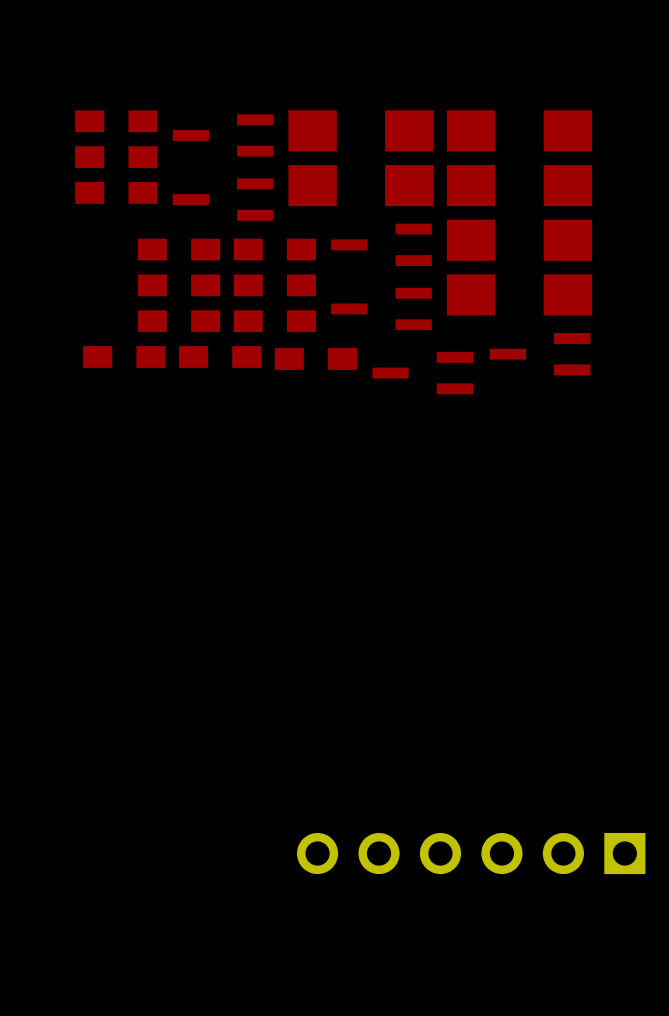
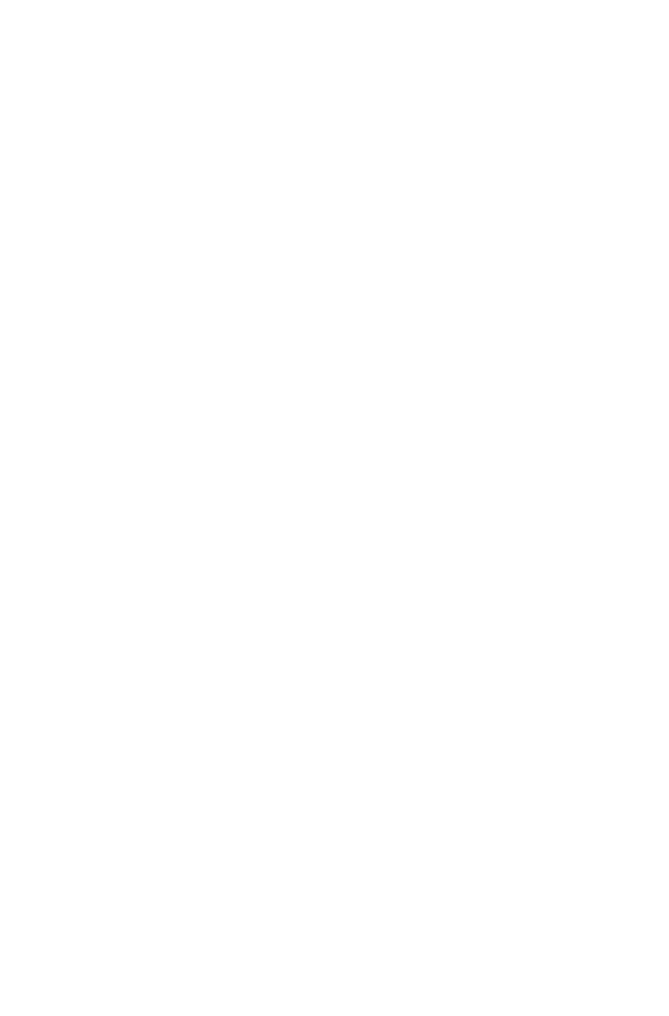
part: (116, 121) -> none
part: (360, 130) -> none
part: (519, 130) -> none
part: (223, 135) -> none
part: (116, 157) -> none
part: (360, 185) -> none
part: (519, 185) -> none
part: (116, 192) -> none
part: (223, 199) -> none
part: (519, 240) -> none
part: (381, 244) -> none
part: (179, 249) -> none
part: (274, 249) -> none
part: (179, 285) -> none
part: (274, 285) -> none
part: (519, 294) -> none
part: (381, 308) -> none
part: (179, 321) -> none
part: (274, 321) -> none
part: (540, 354) -> none
part: (124, 356) -> none
part: (220, 356) -> none
part: (315, 358) -> none
part: (422, 373) -> none
part: (471, 853) -> none

